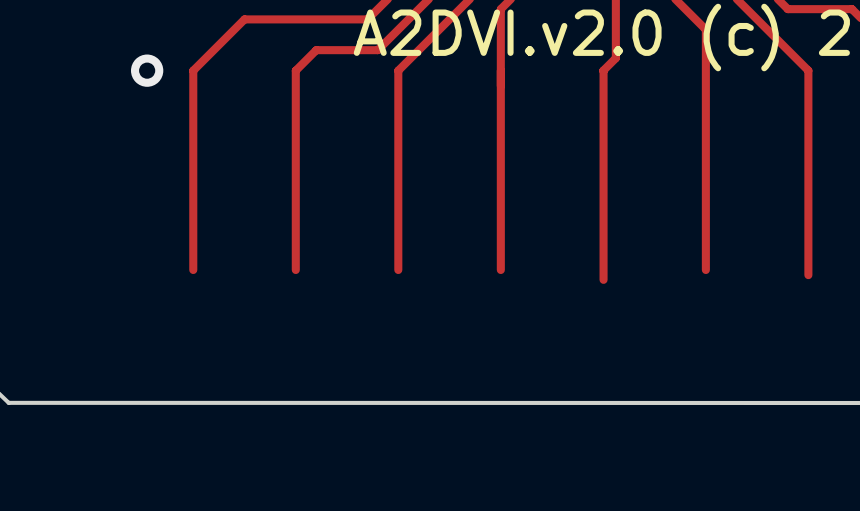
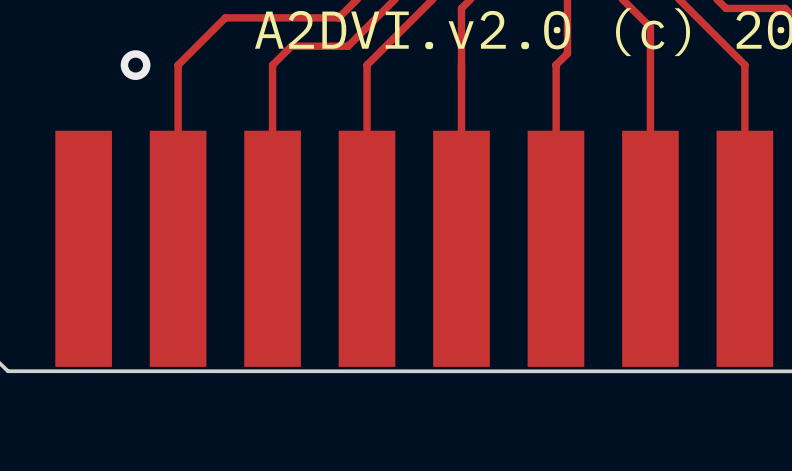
part: none -> (83, 248)
part: none -> (178, 248)
part: none -> (272, 248)
part: none -> (367, 248)
part: none -> (461, 248)
part: none -> (555, 248)
part: none -> (650, 248)
part: none -> (744, 248)

